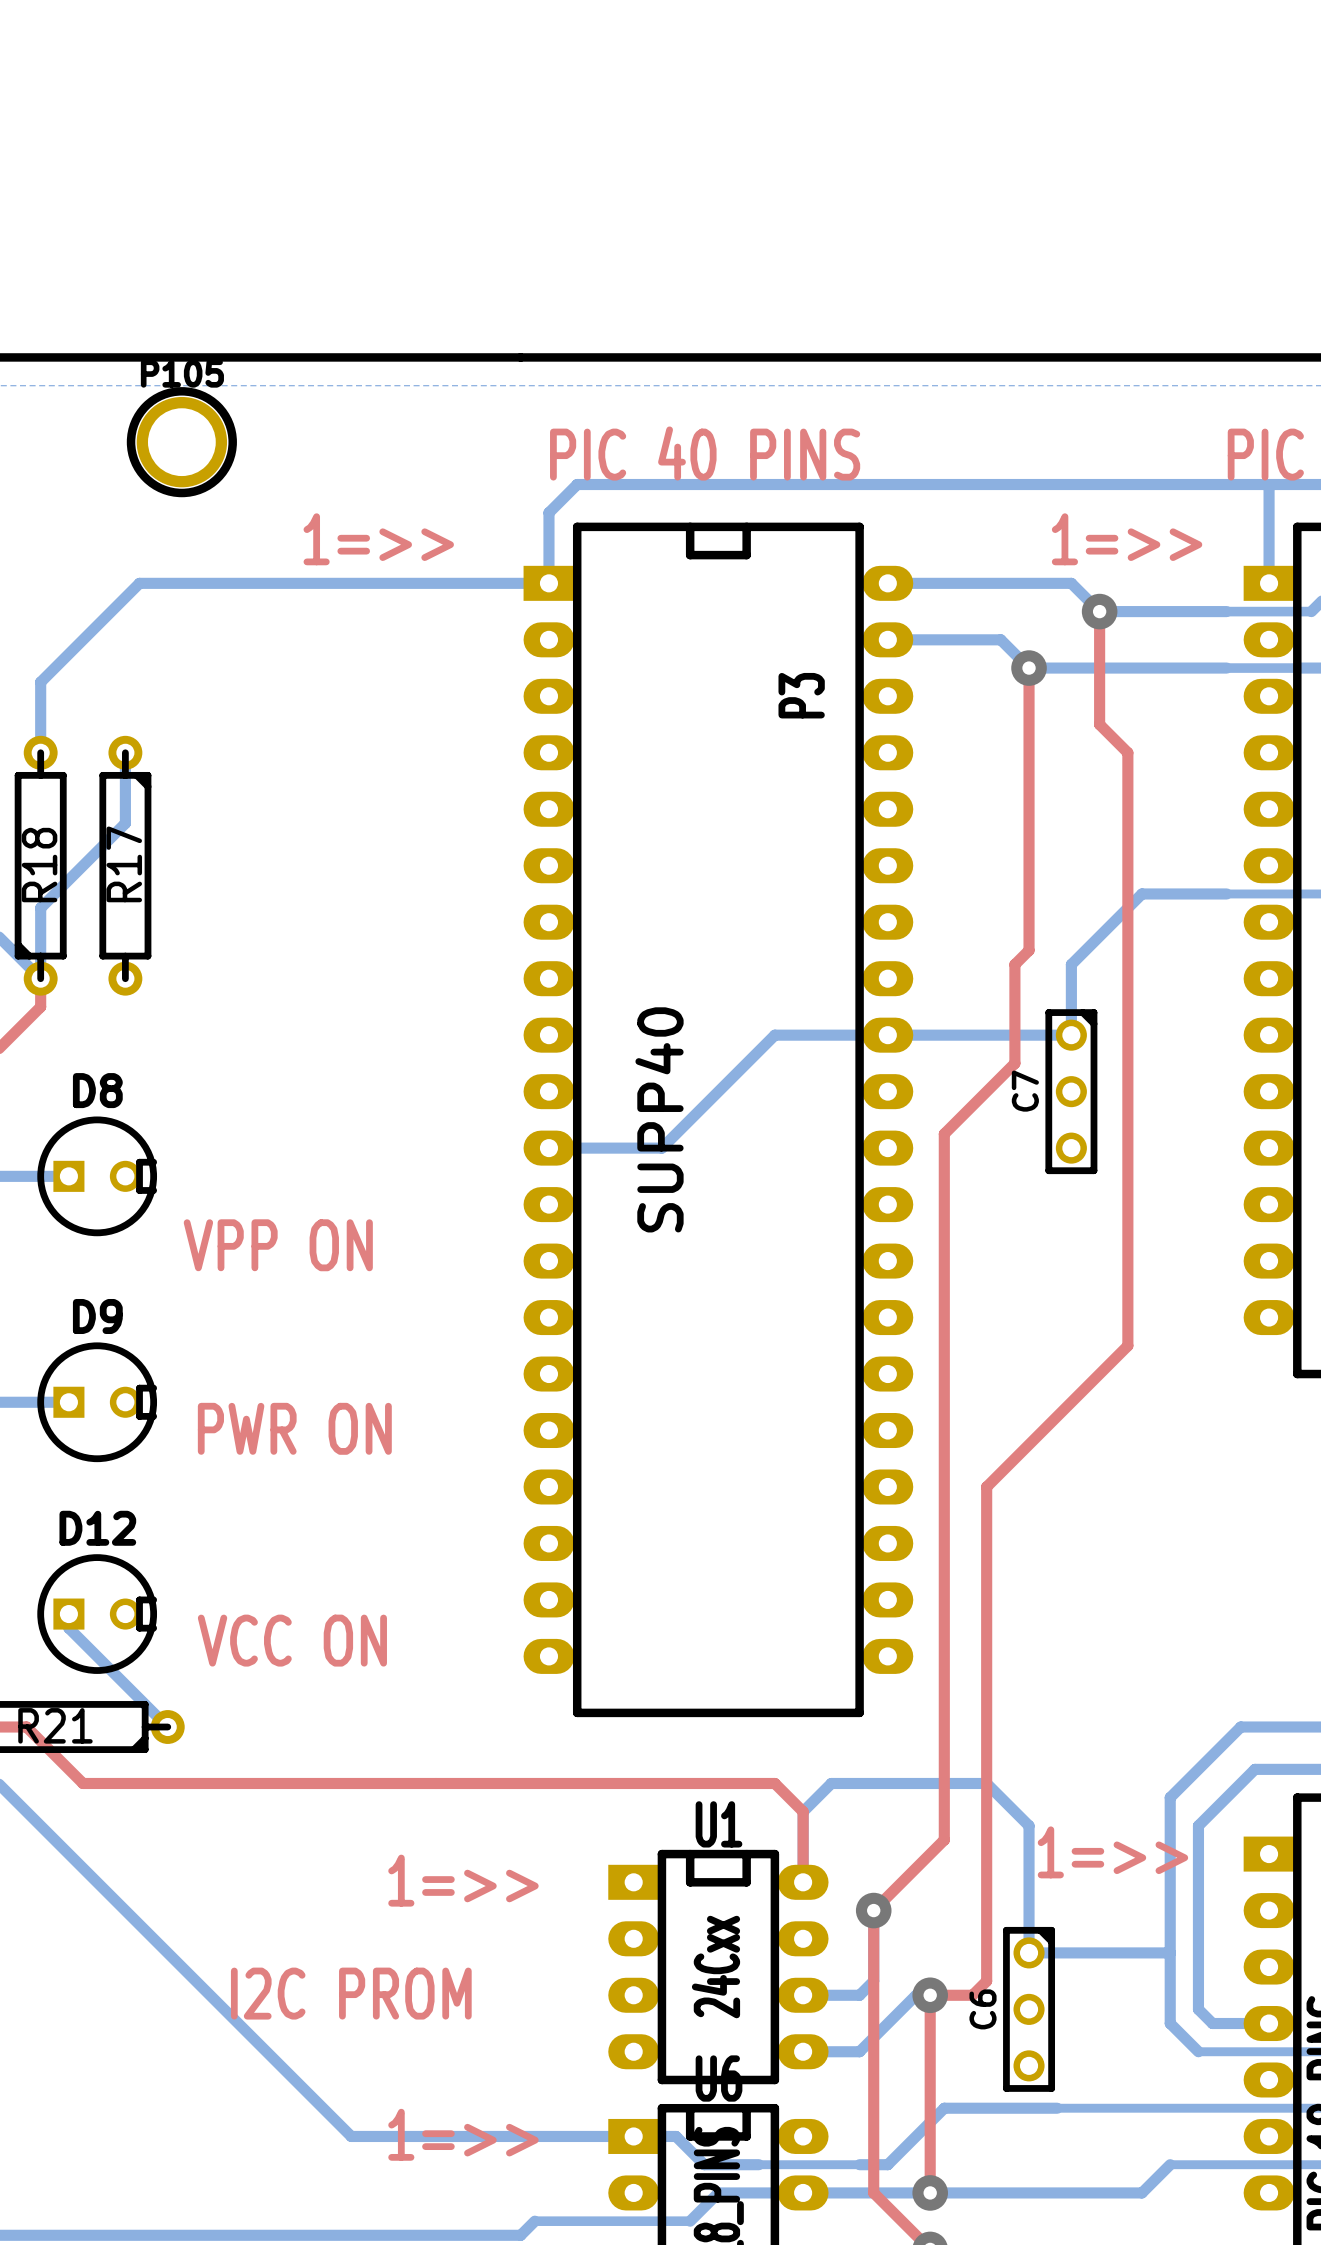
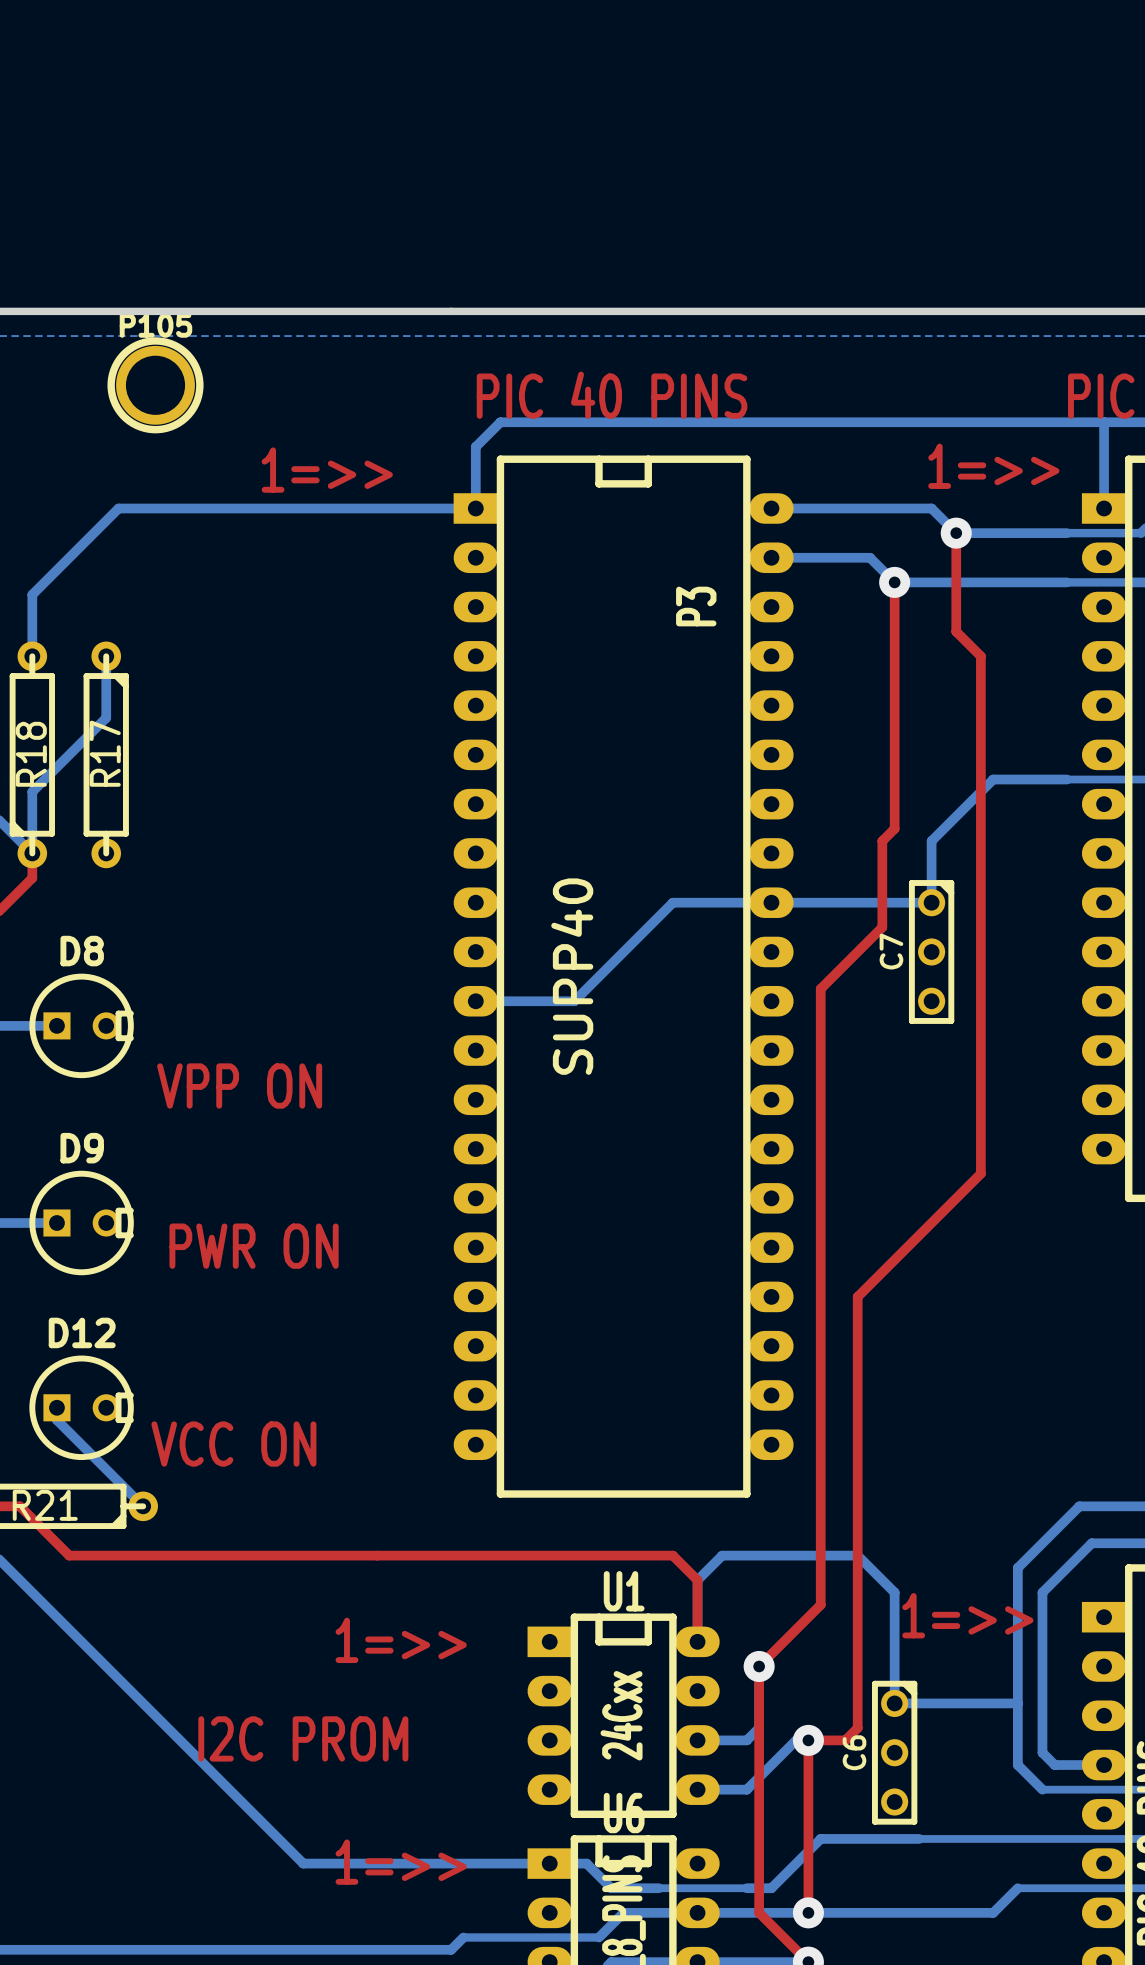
text position: 1=>> (1127, 539) -> 1=>> (993, 466)
text position: VCC ON (292, 1640) -> VCC ON (233, 1444)

